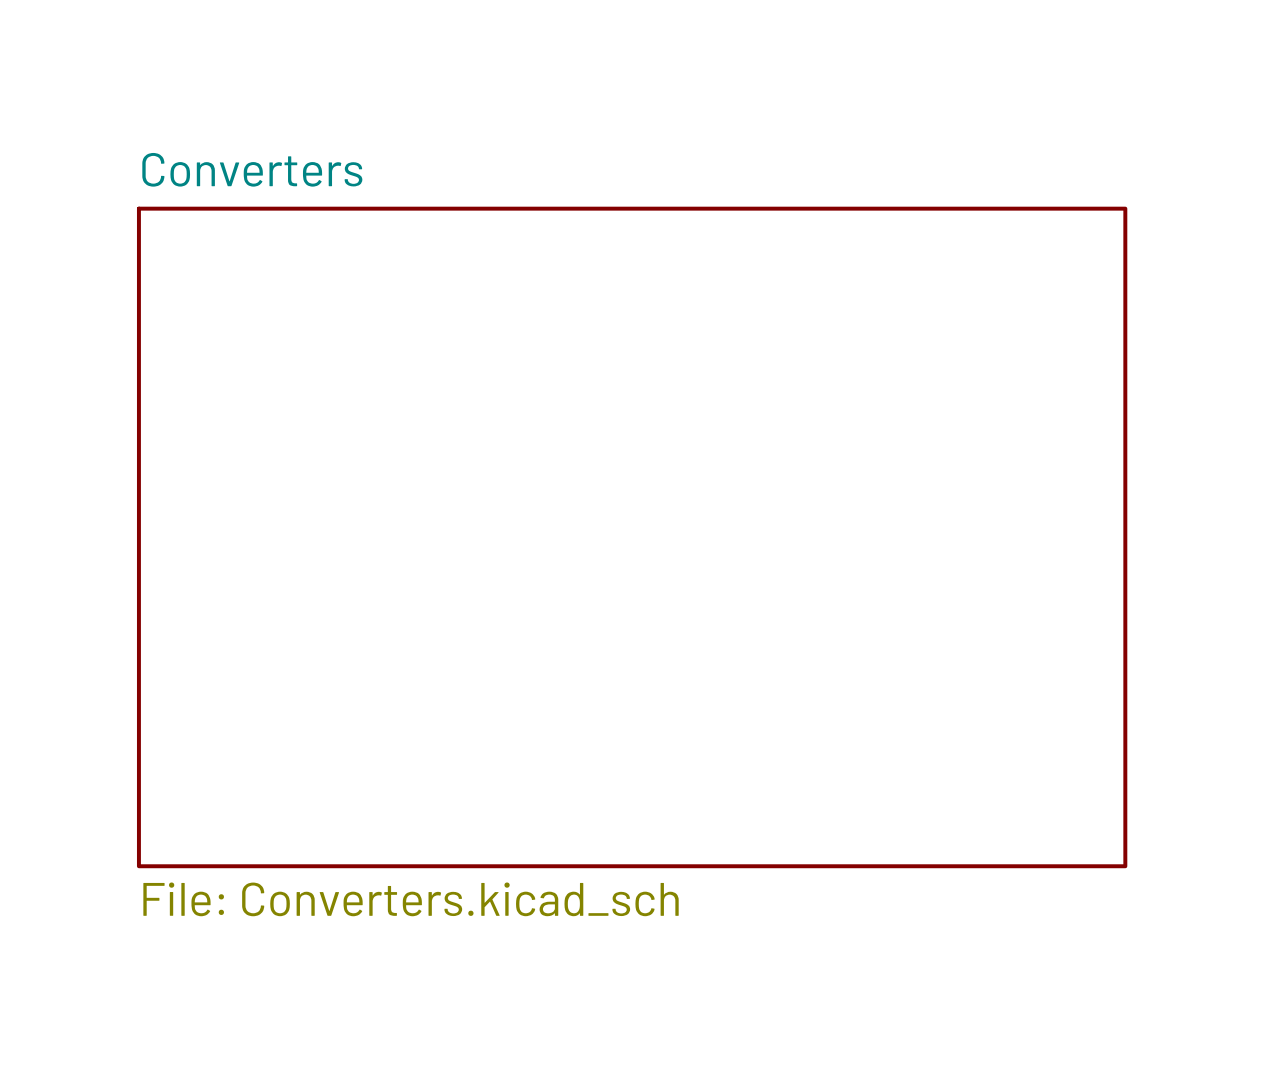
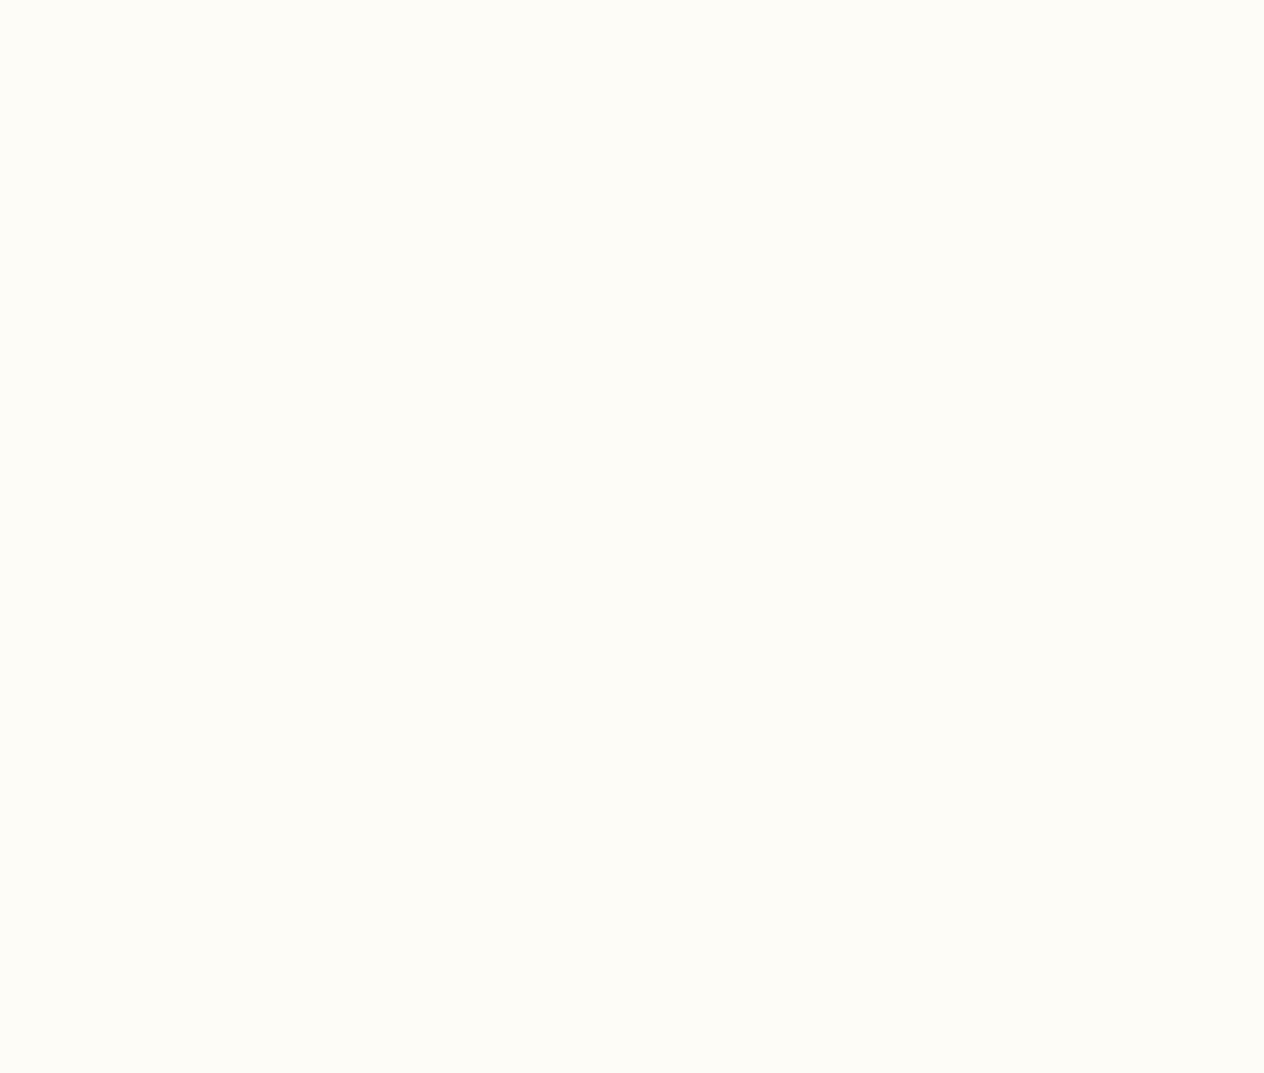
sheet Converters: File: Converters.kicad_sch (632, 537) -> none

